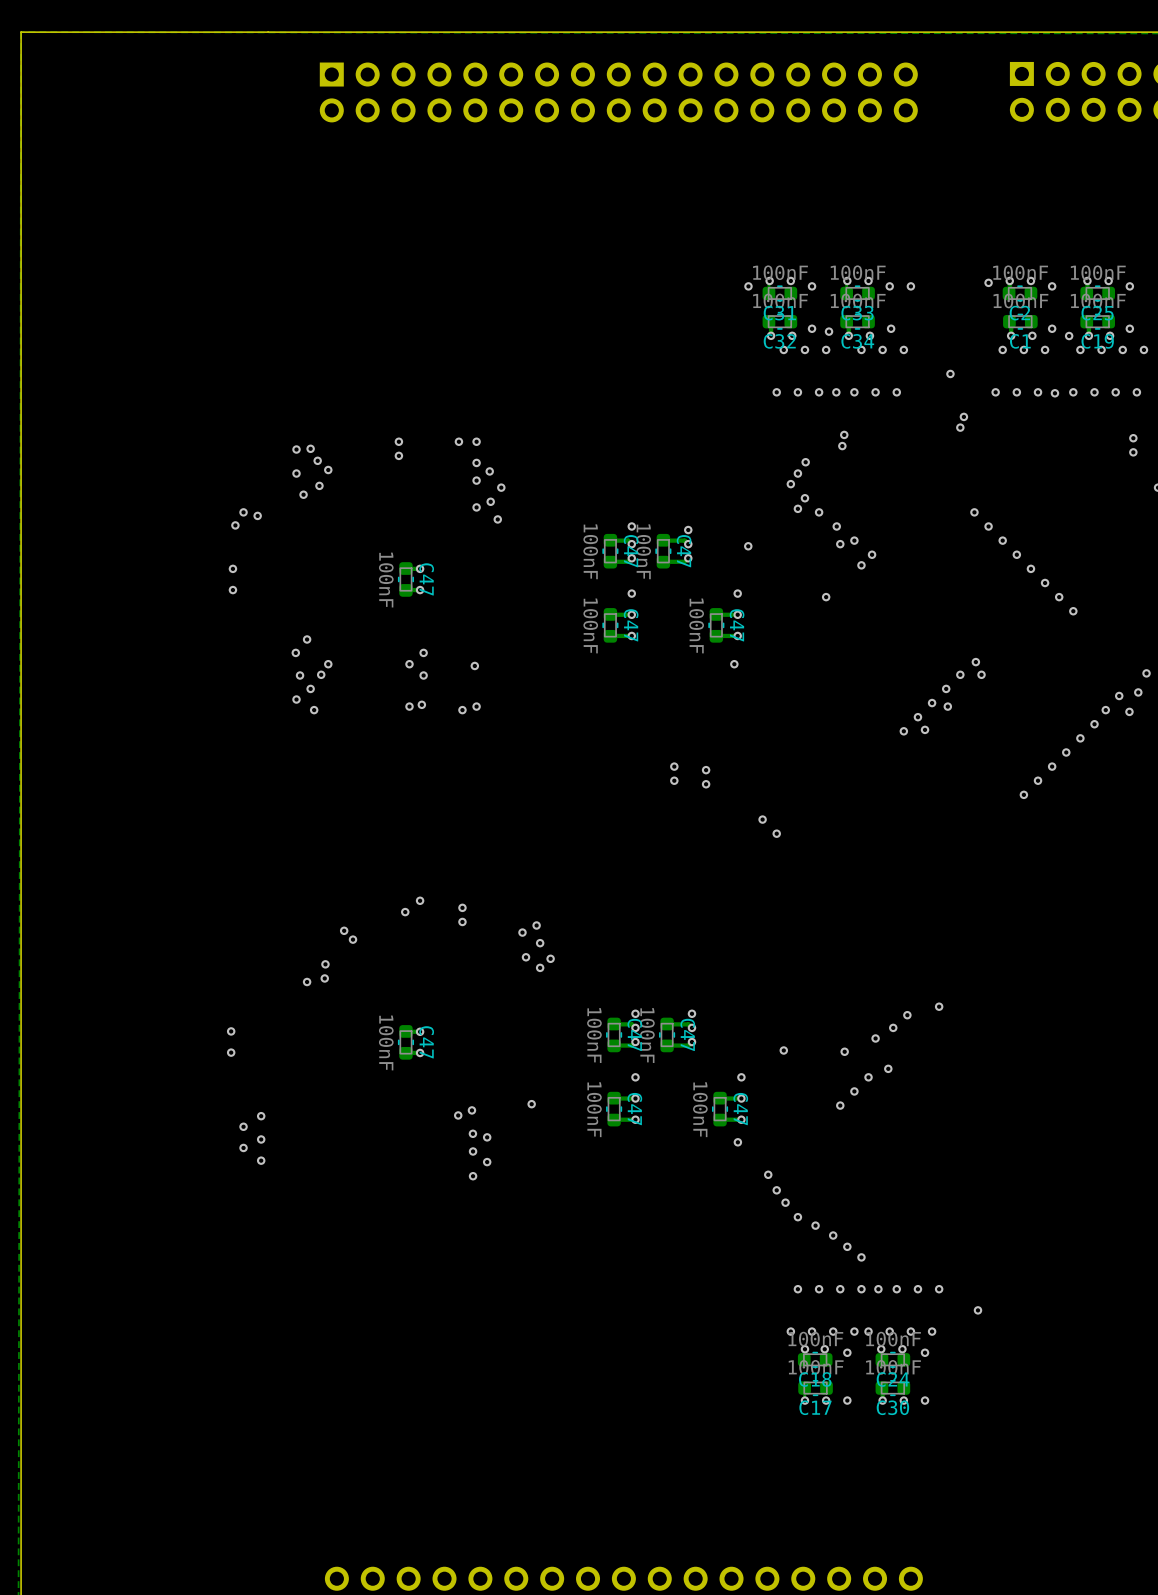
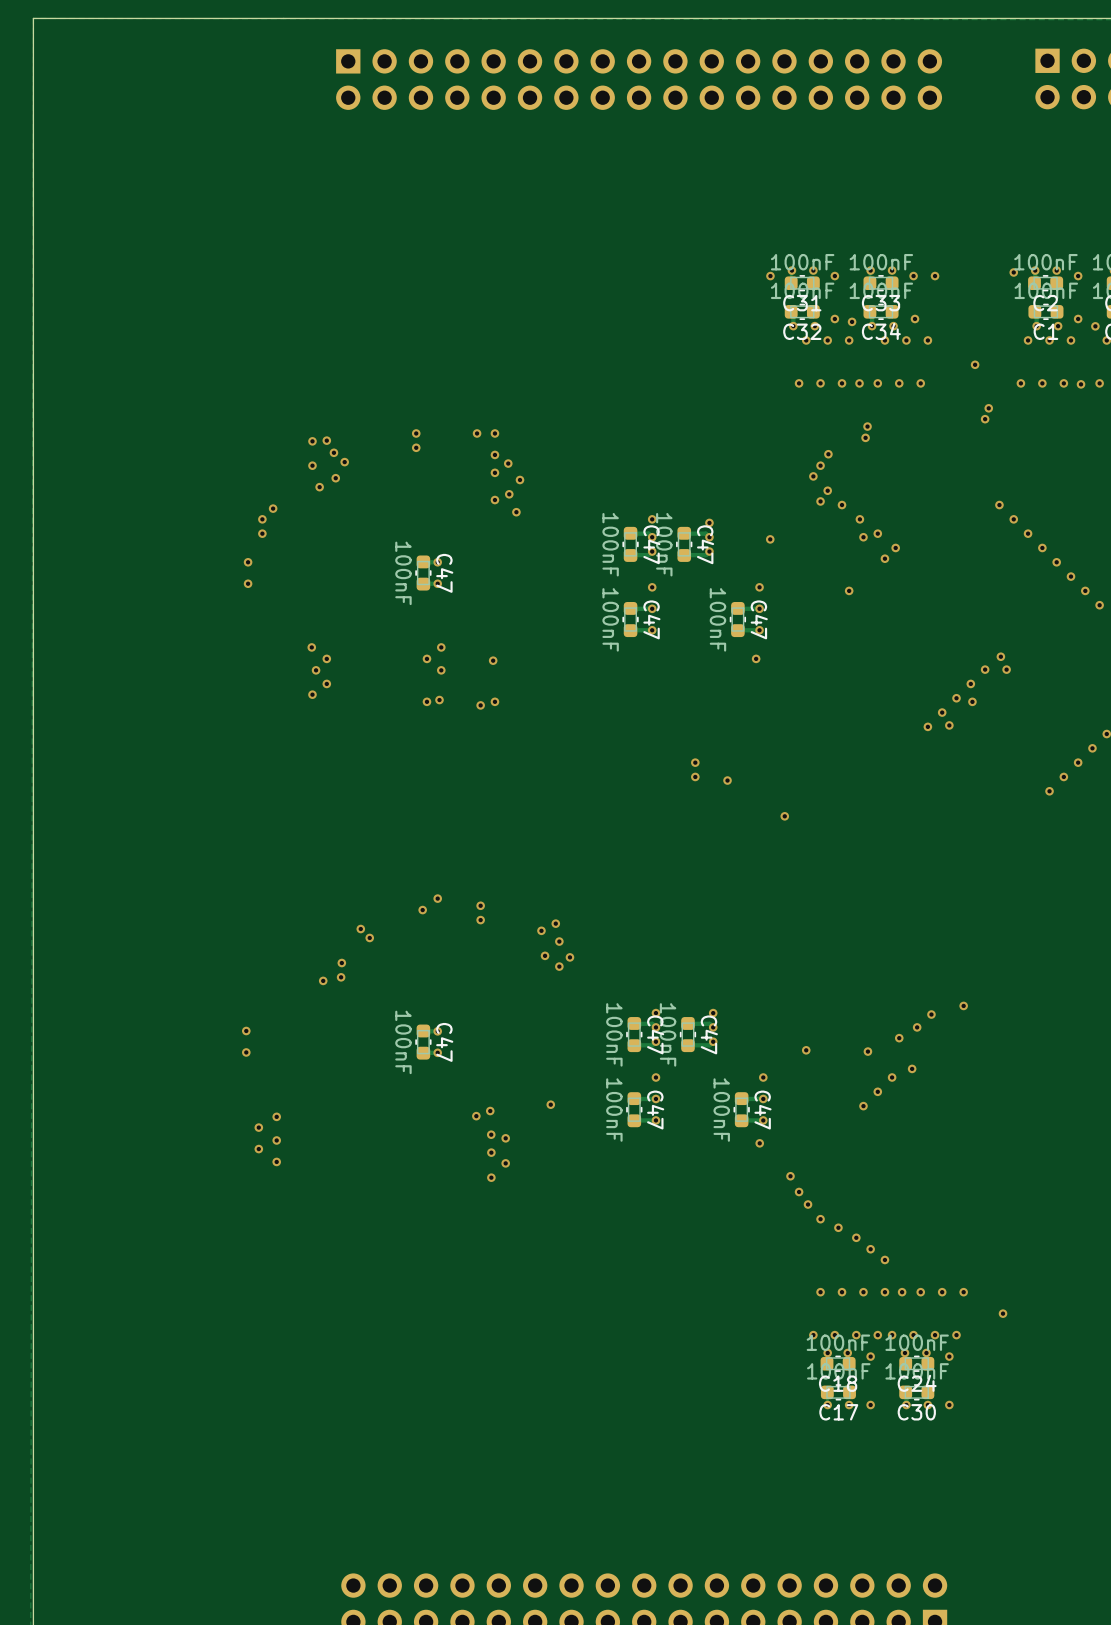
via: (243, 512) -> none
via: (235, 525) -> none
via: none -> (262, 519)
via: none -> (262, 533)
via: (307, 639) -> none
via: none -> (326, 658)
via: (328, 664) -> none
via: (321, 674) -> none
via: (314, 710) -> none
via: (706, 770) -> none
via: (776, 833) -> none

